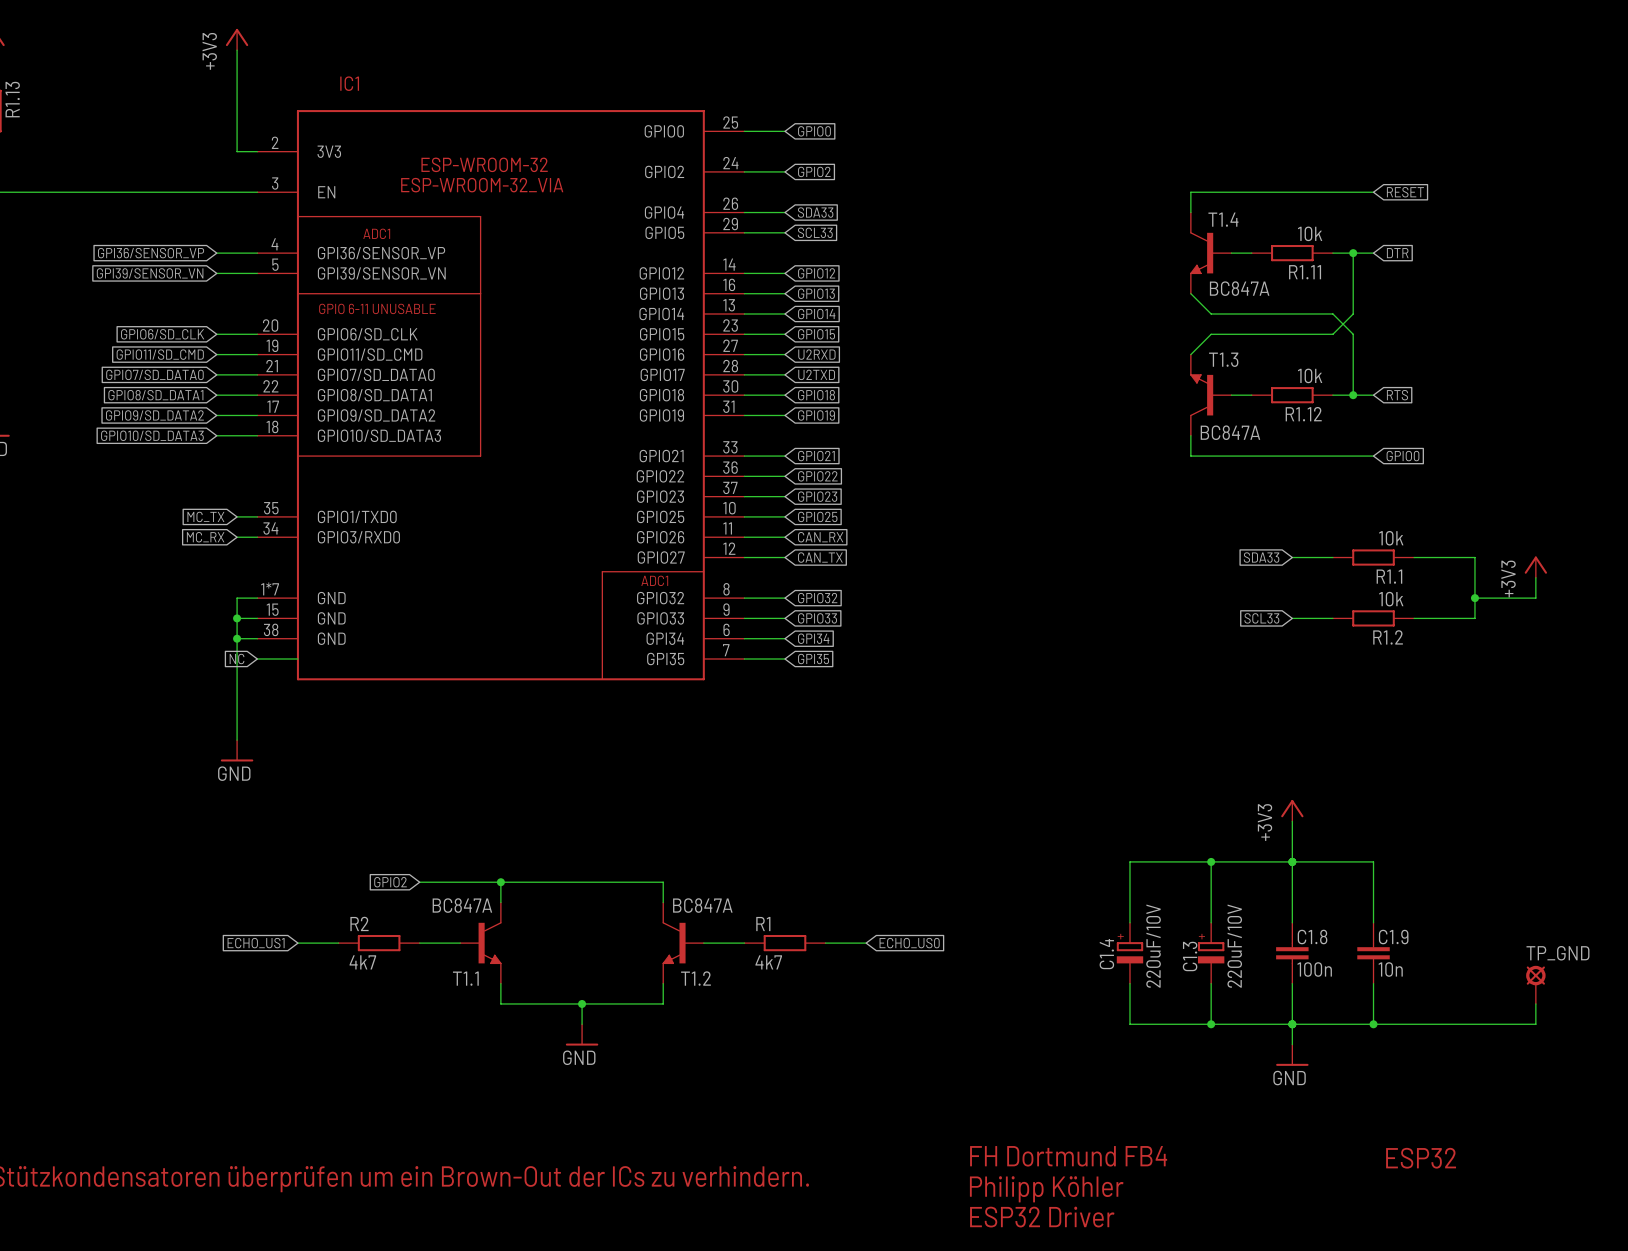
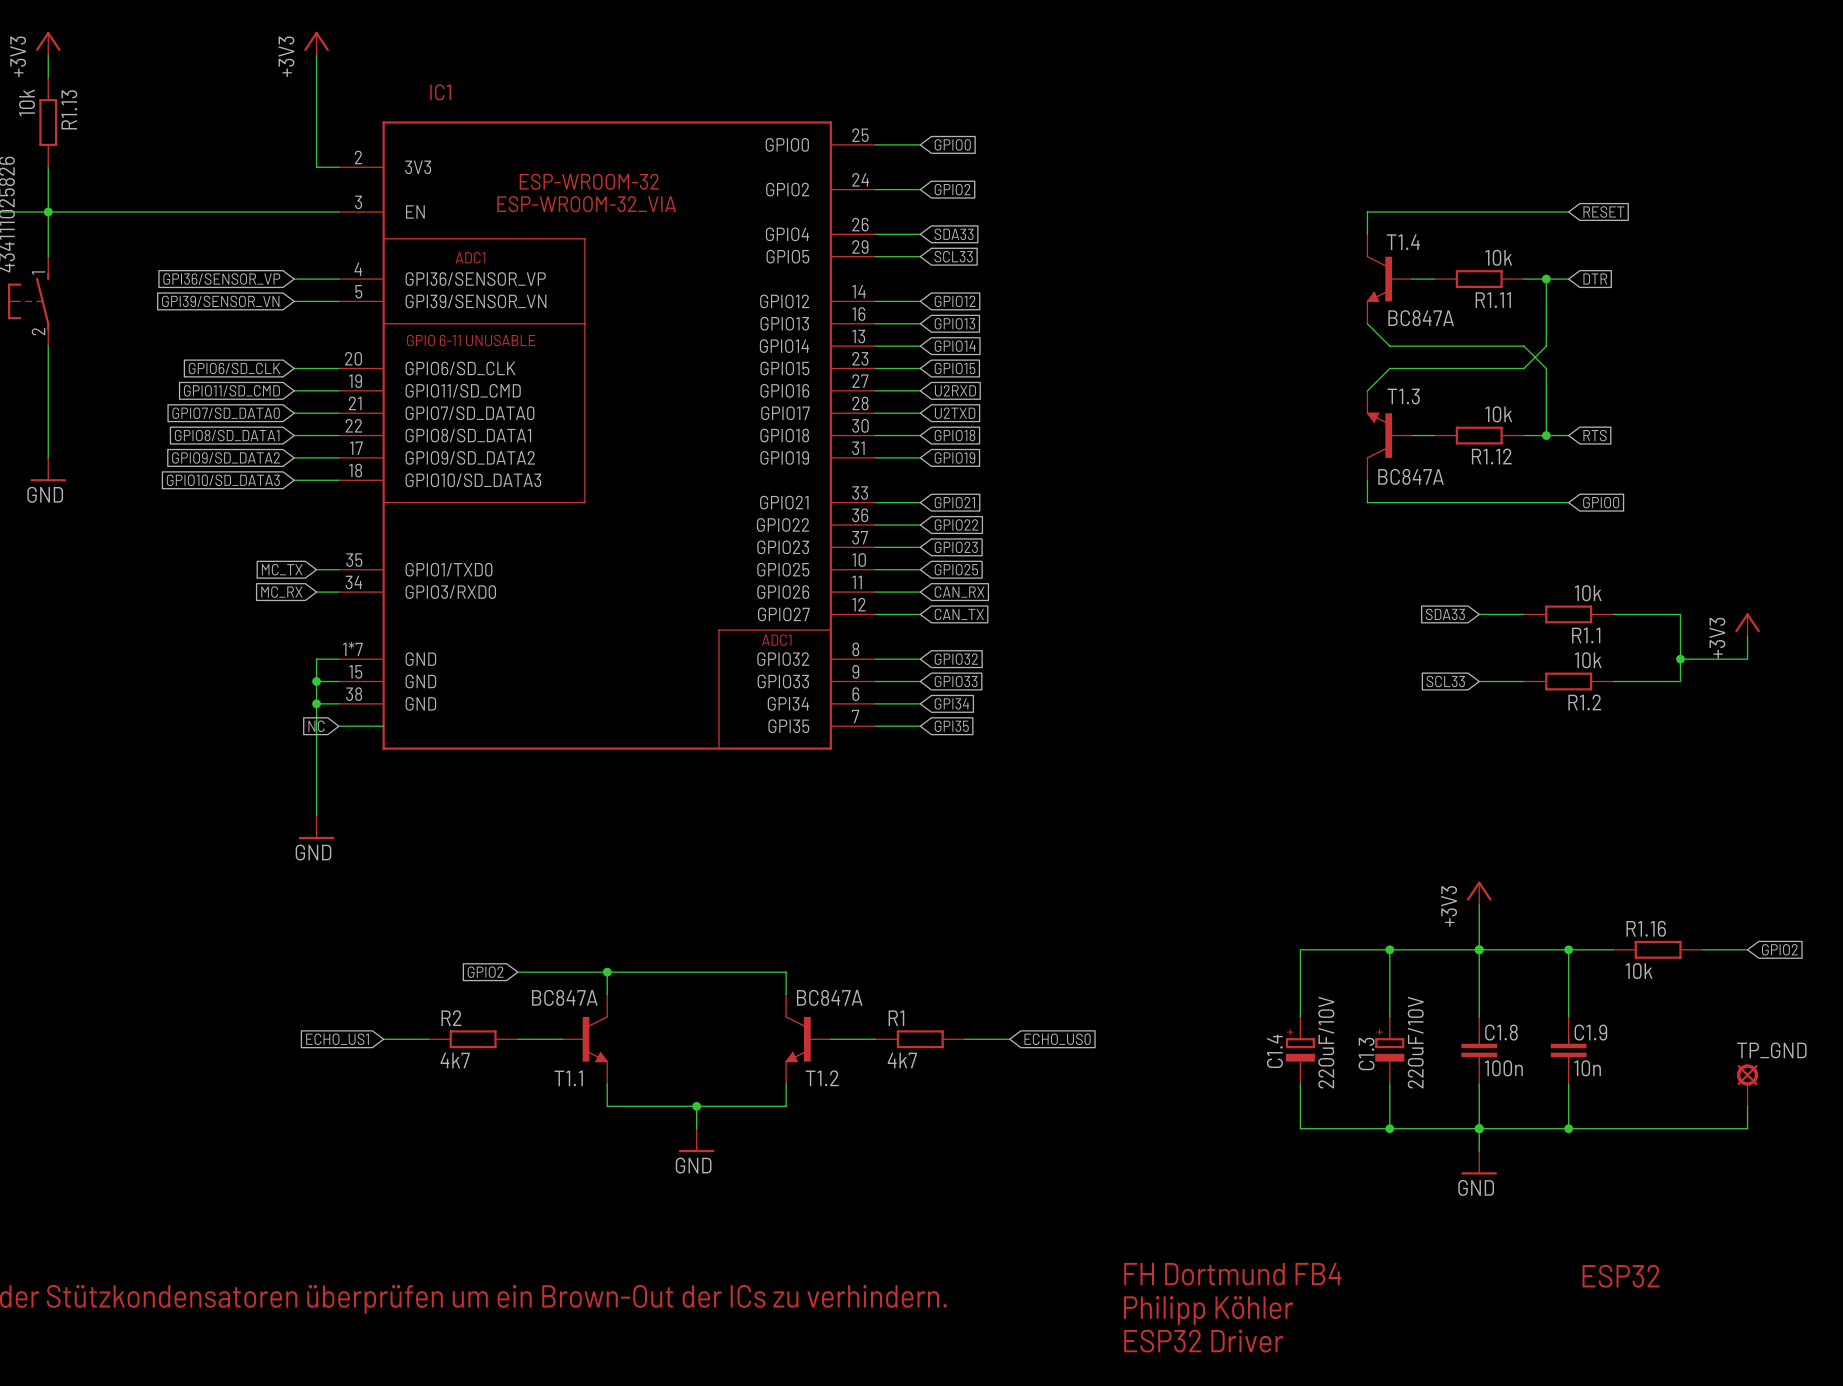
wire: none -> (1568, 949) (1613, 949)
junction: none -> (1568, 949)
R1.16: none -> 10k (1658, 949)
wire: none -> (1702, 949) (1747, 949)
global label: none -> GPIO2 (1779, 949)

